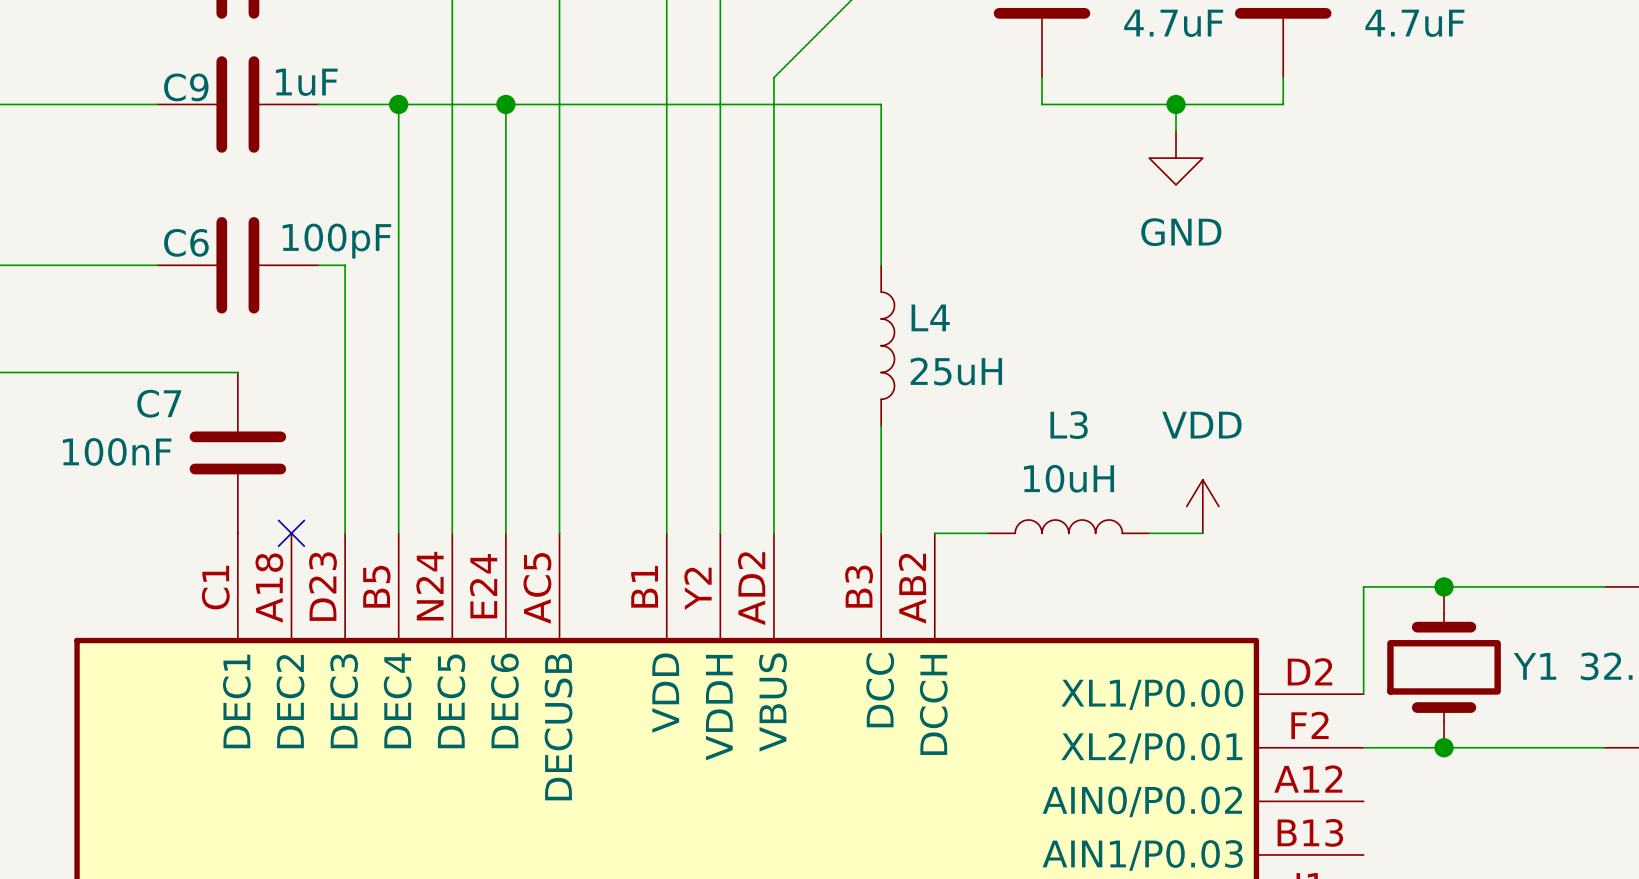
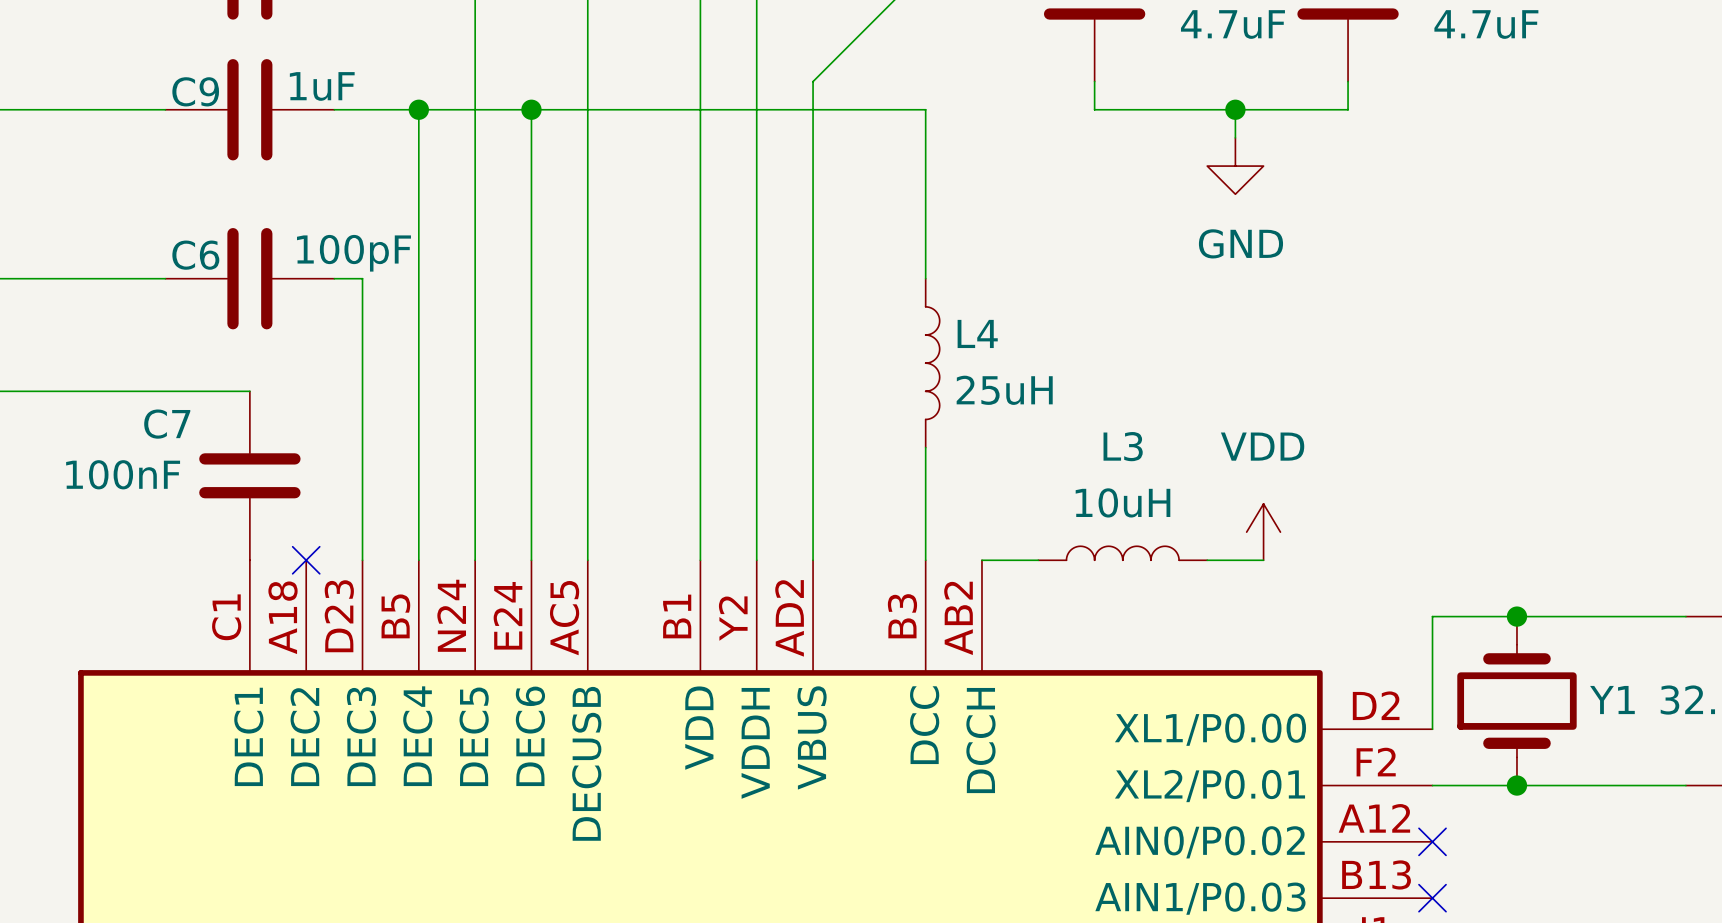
no-connect mark: none -> (1432, 841)
no-connect mark: none -> (1432, 898)

